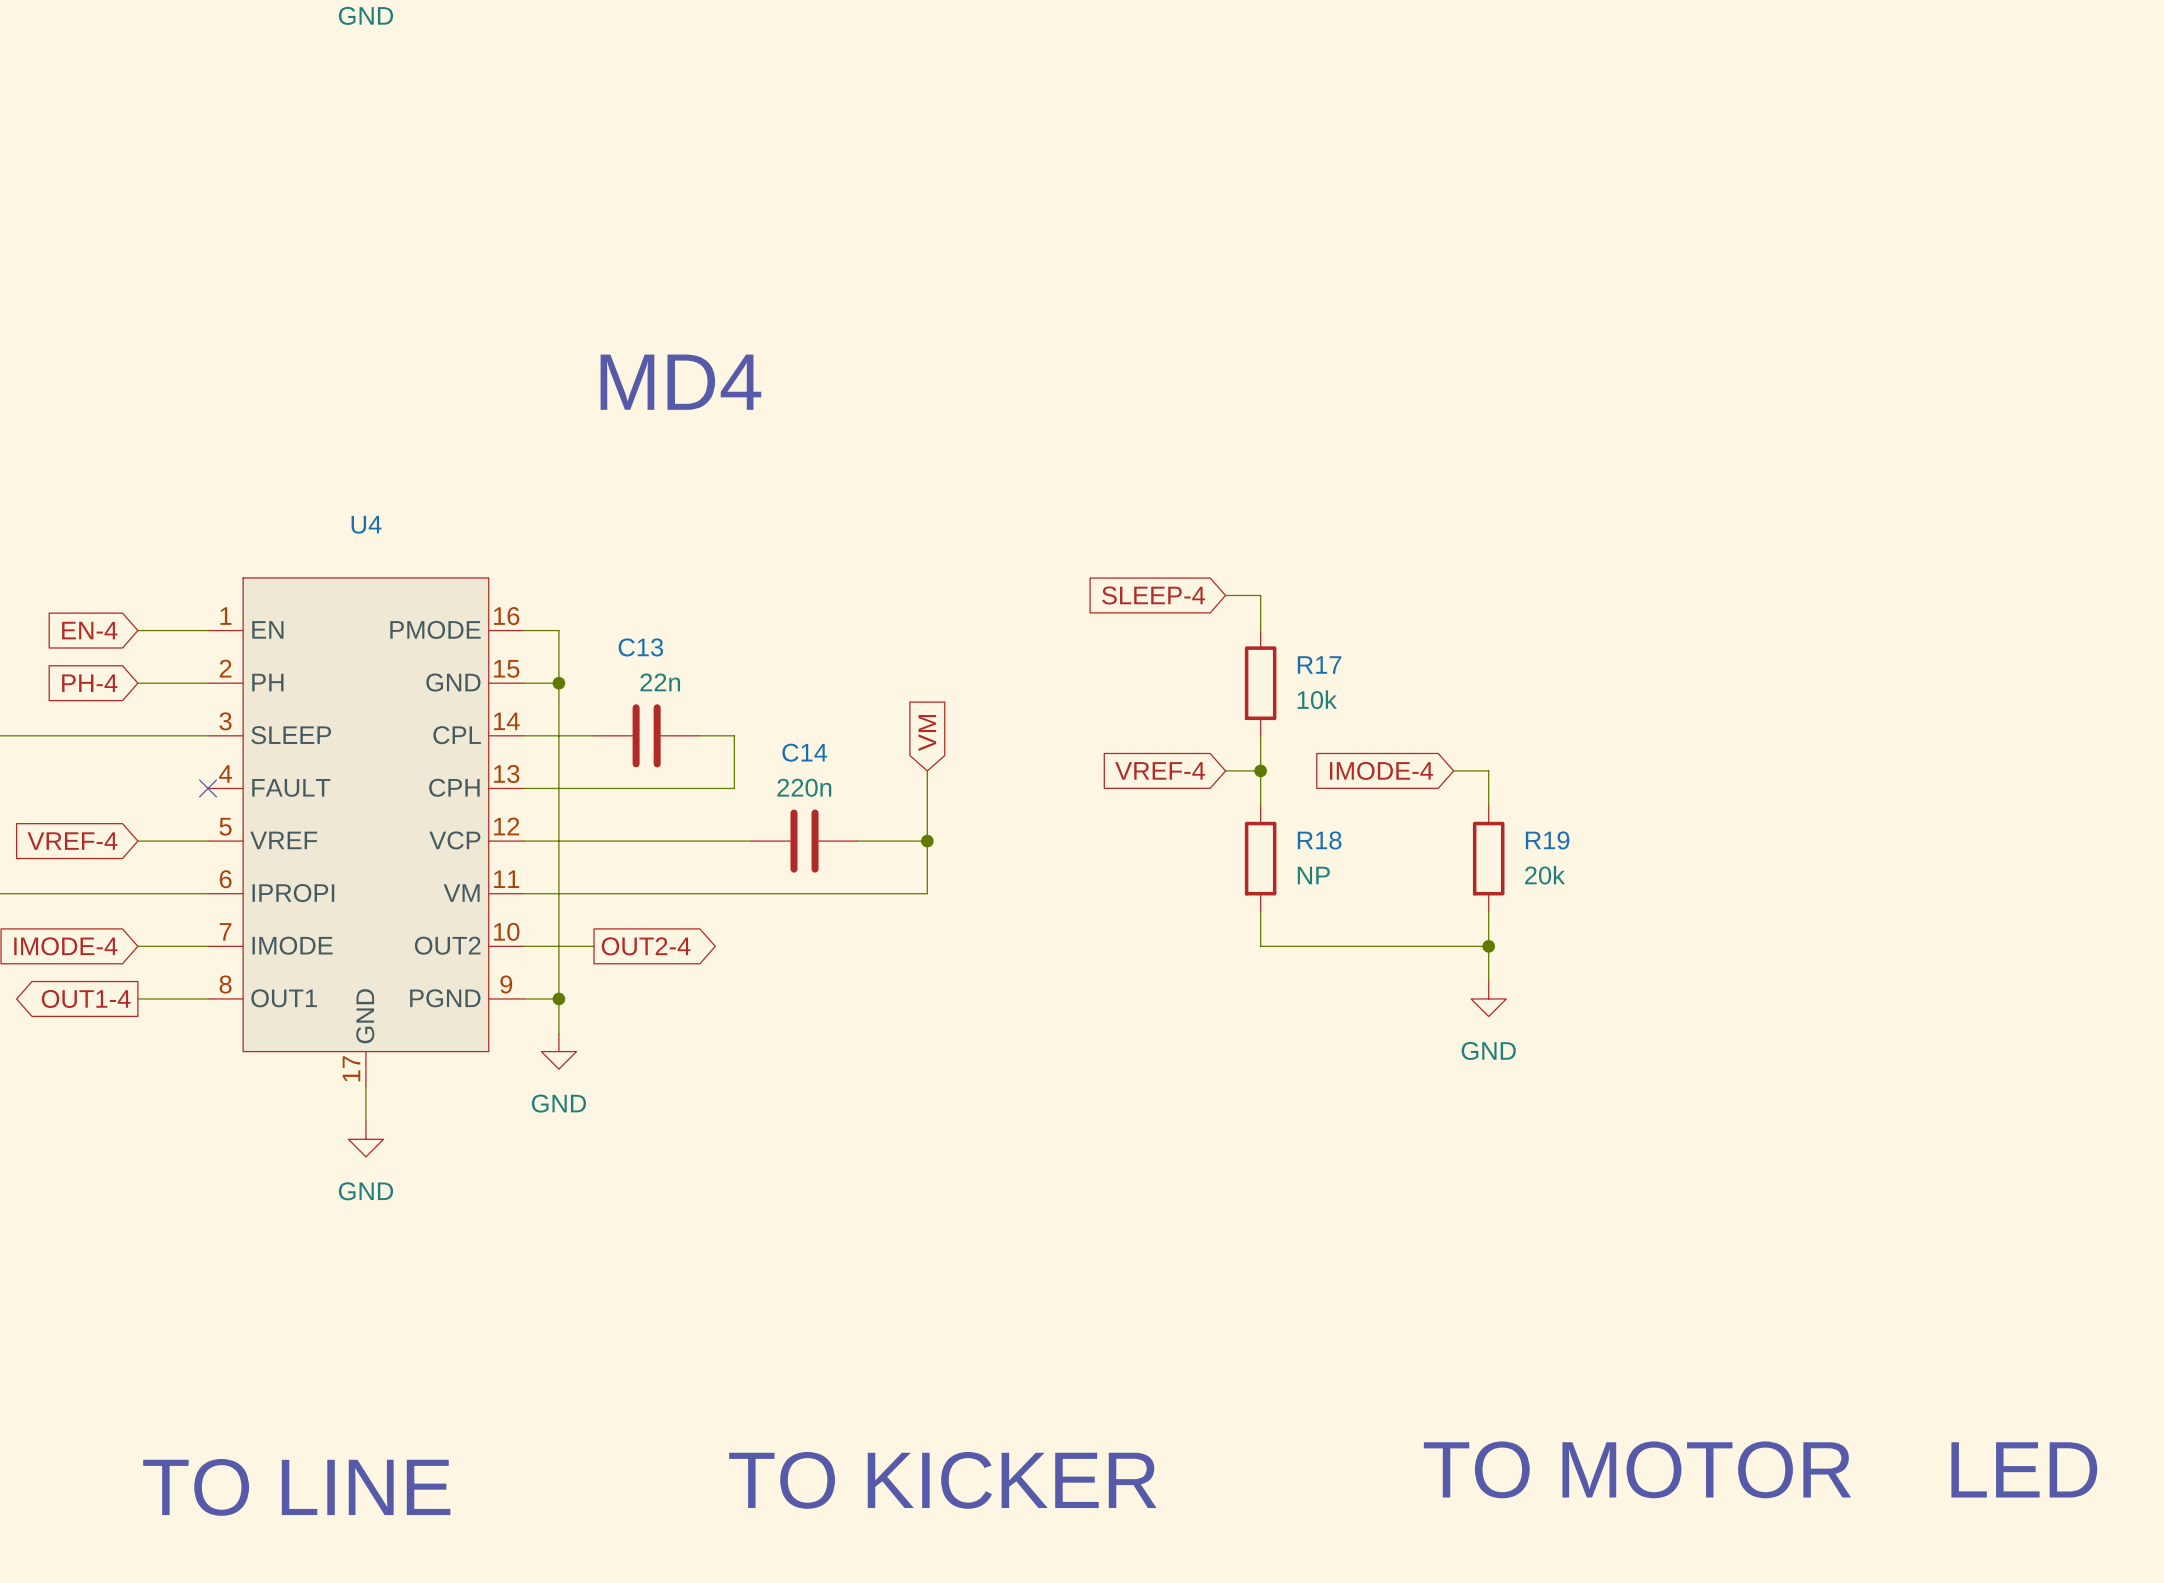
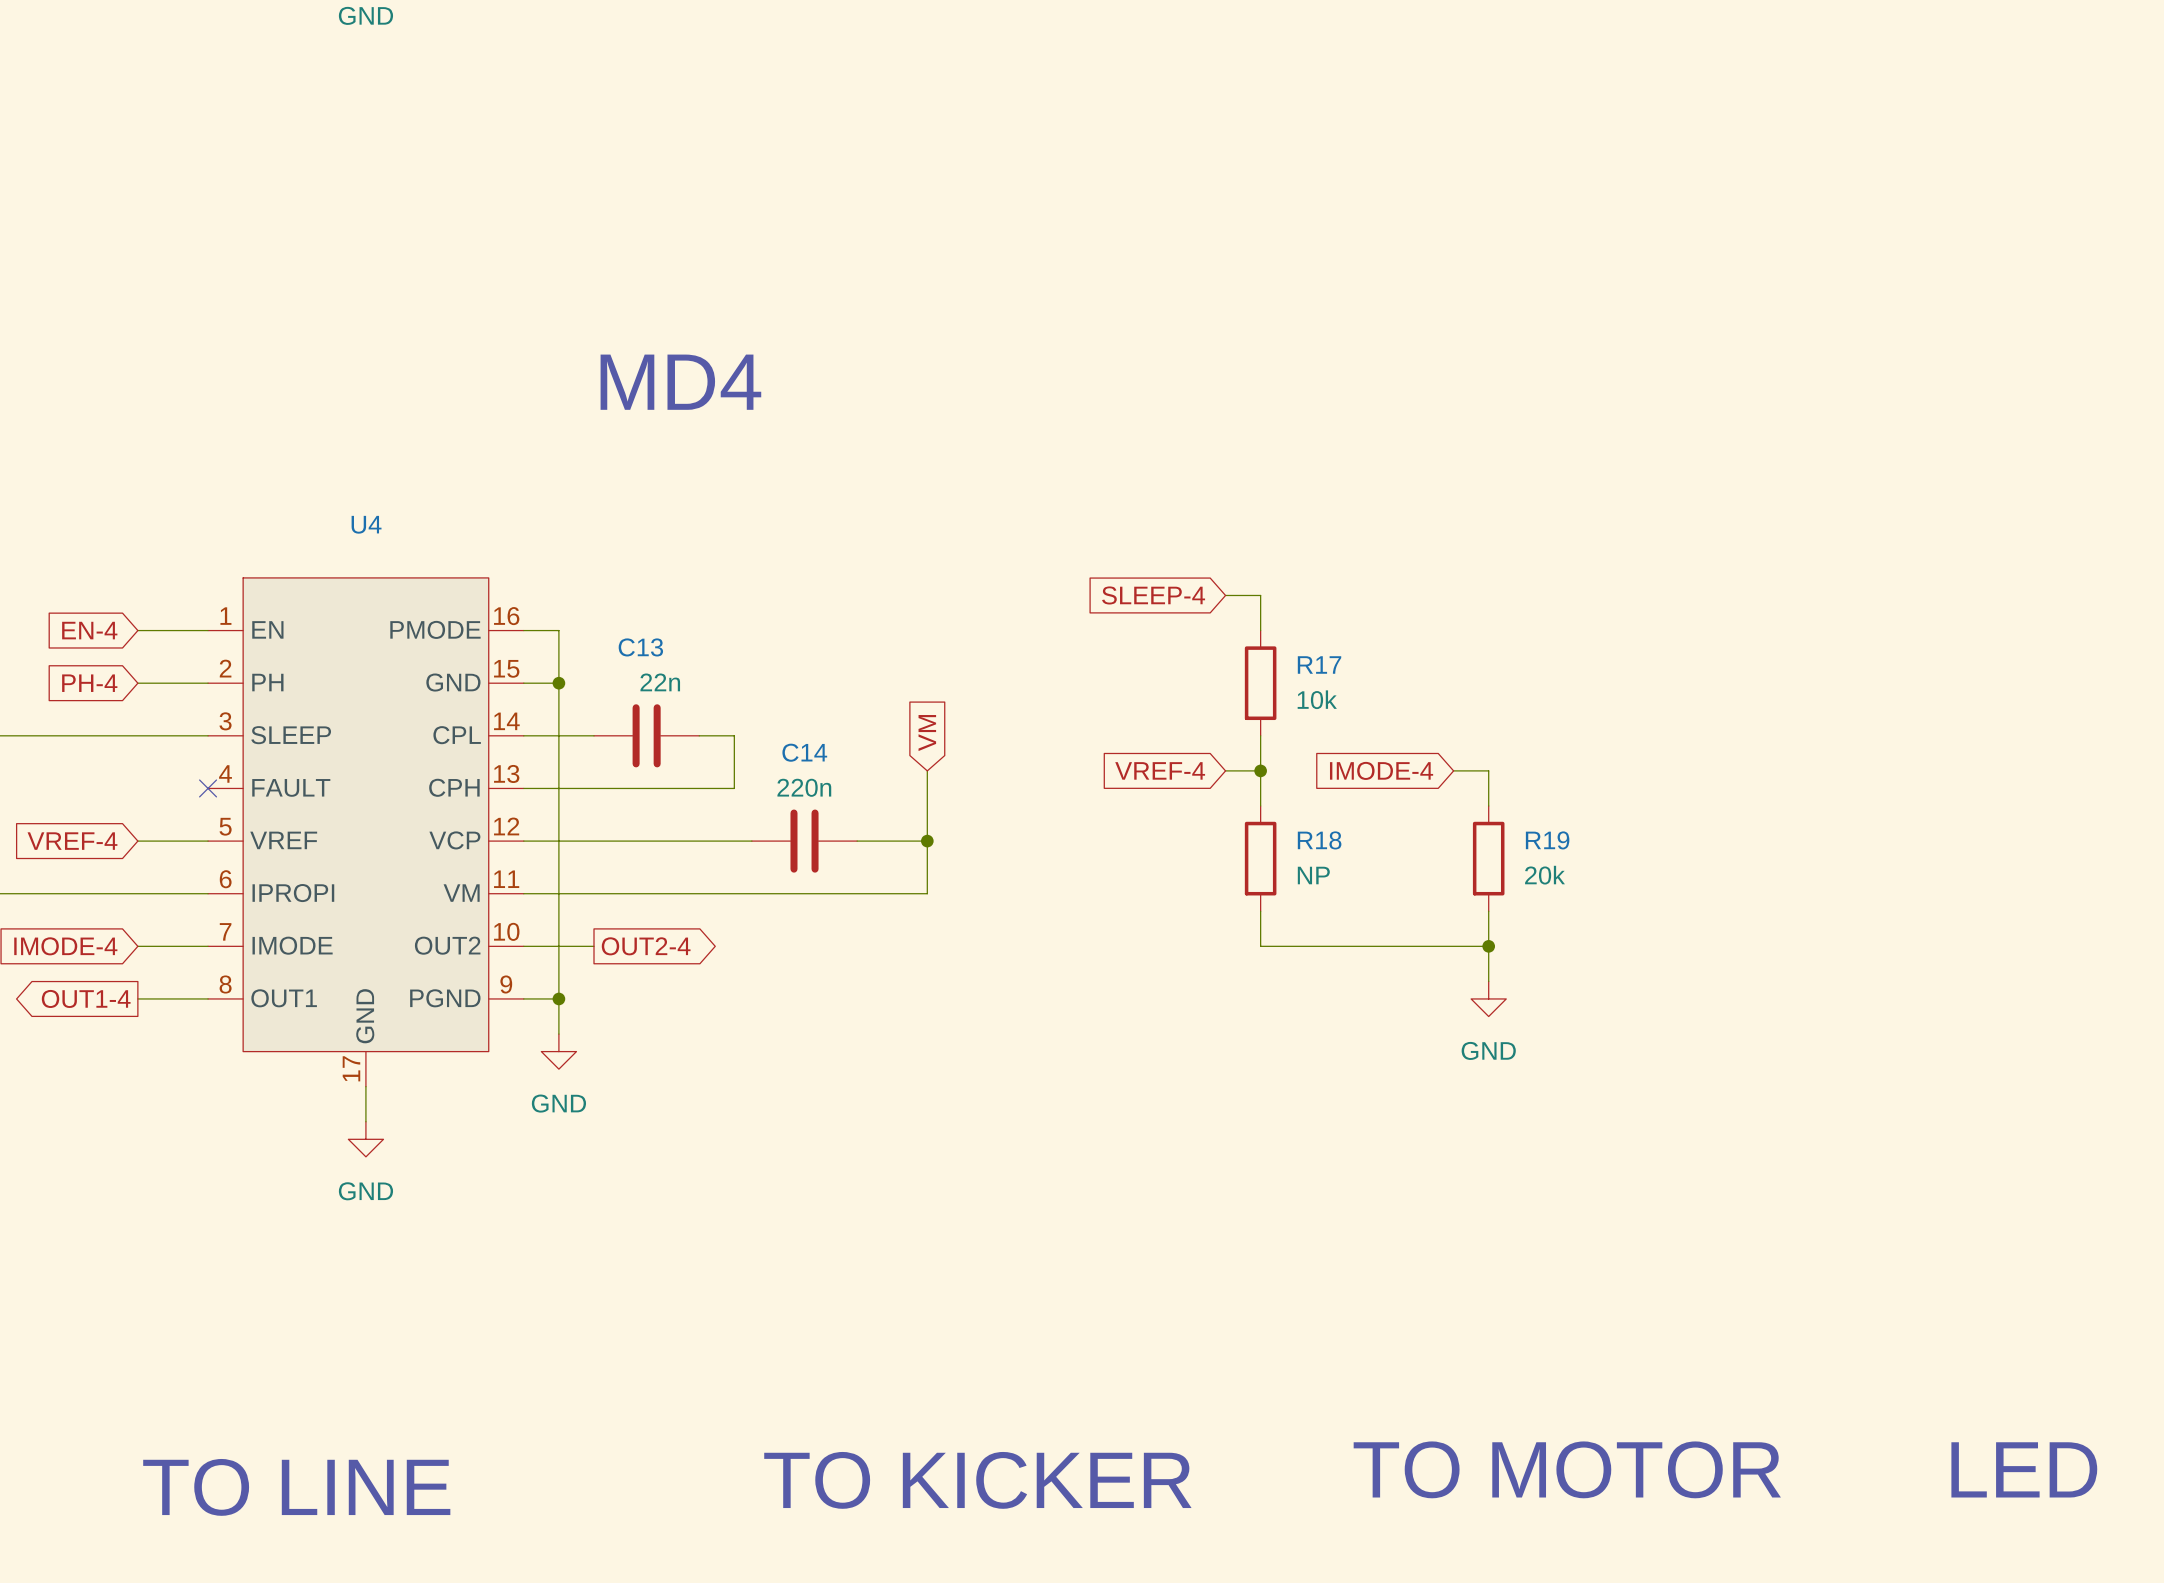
text position: TO MOTOR (1637, 1469) -> TO MOTOR (1567, 1469)
text position: TO KICKER (942, 1480) -> TO KICKER (977, 1480)

